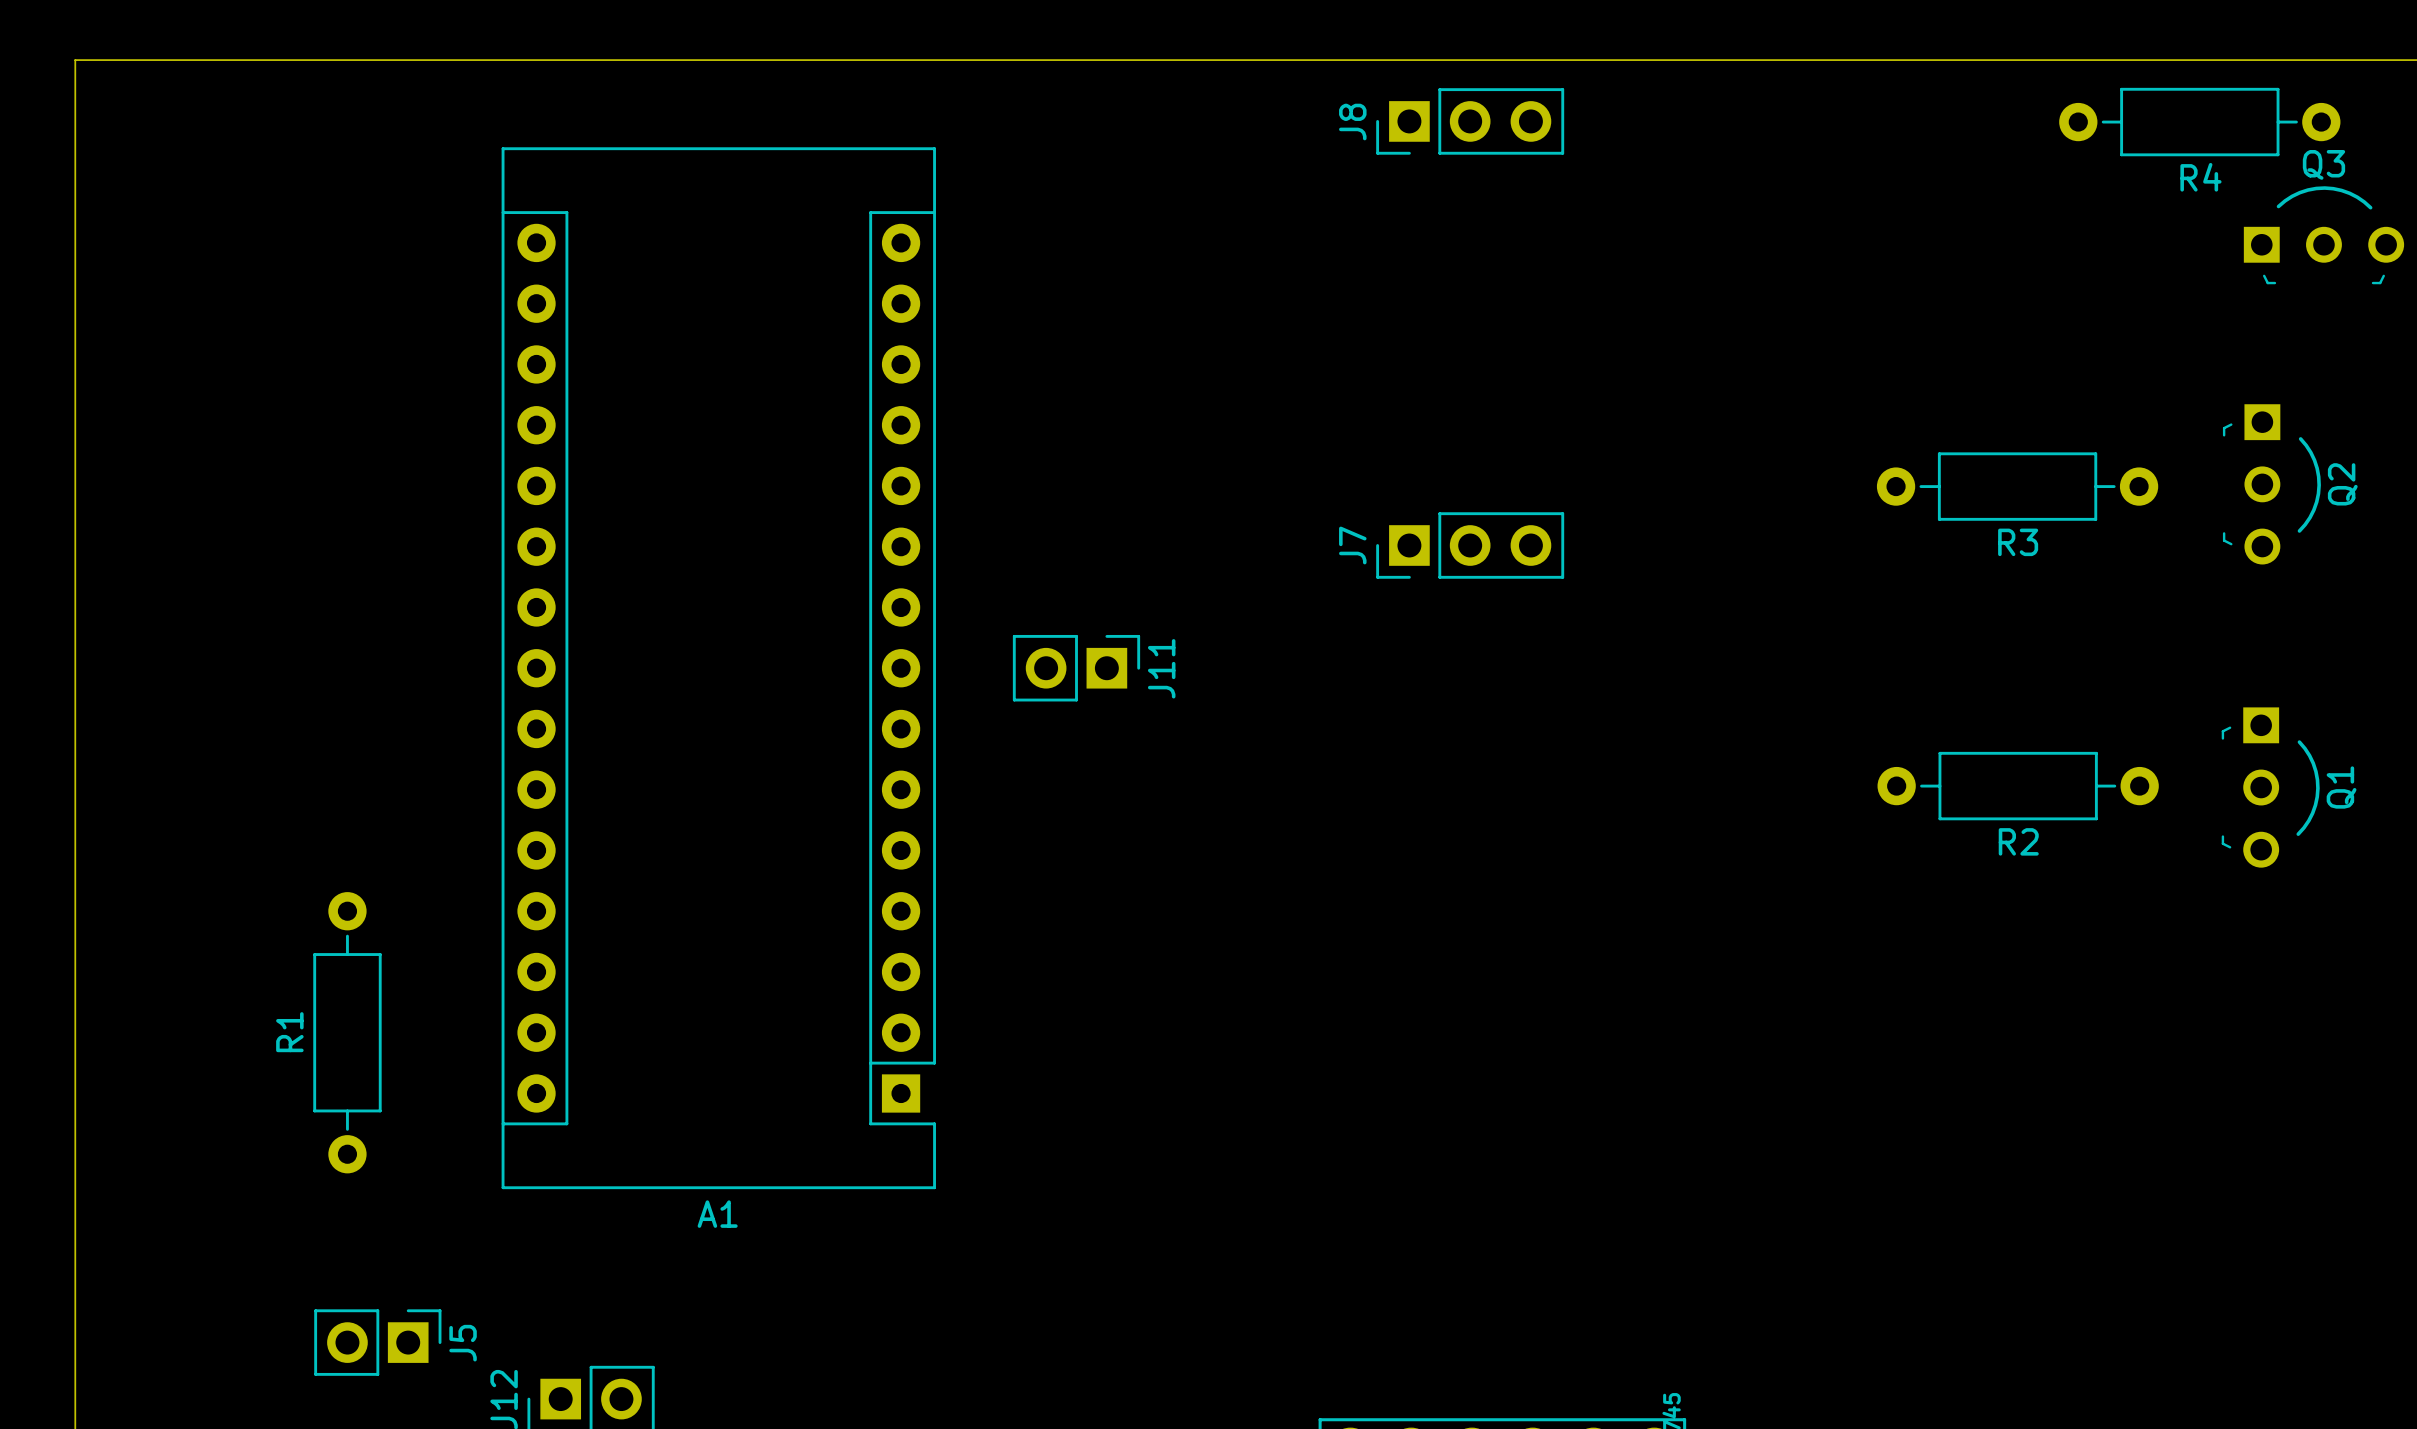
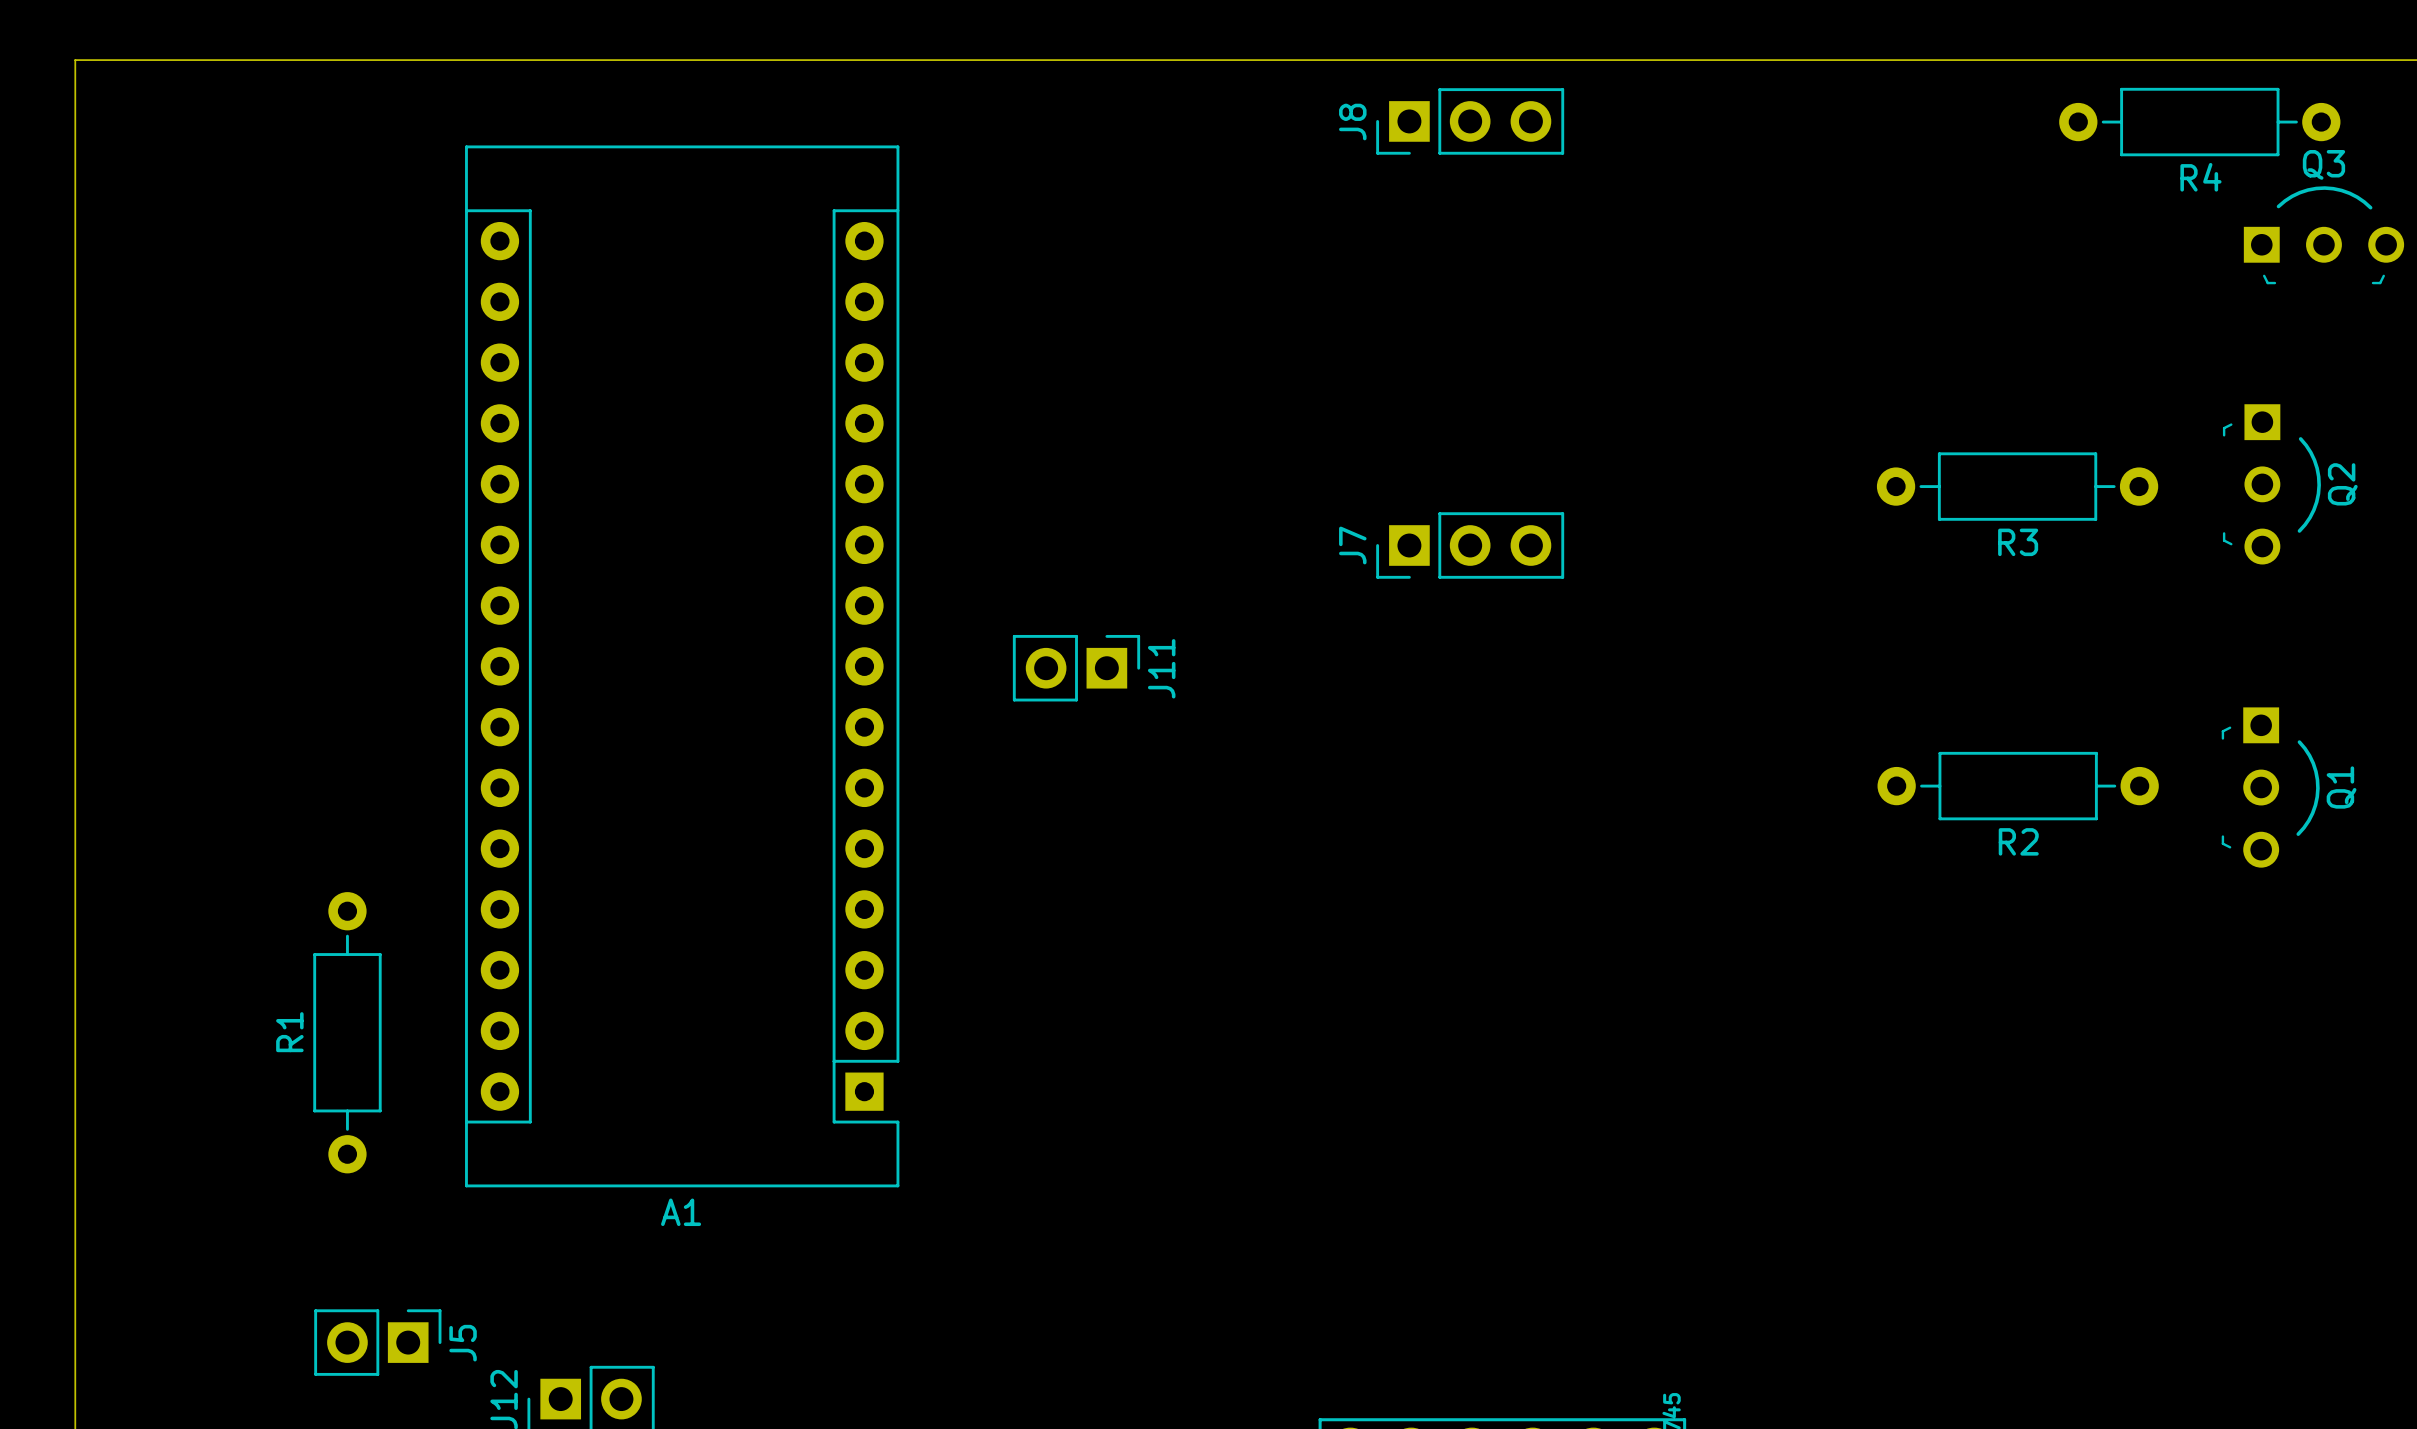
A1 position: (718, 668) -> (682, 666)

